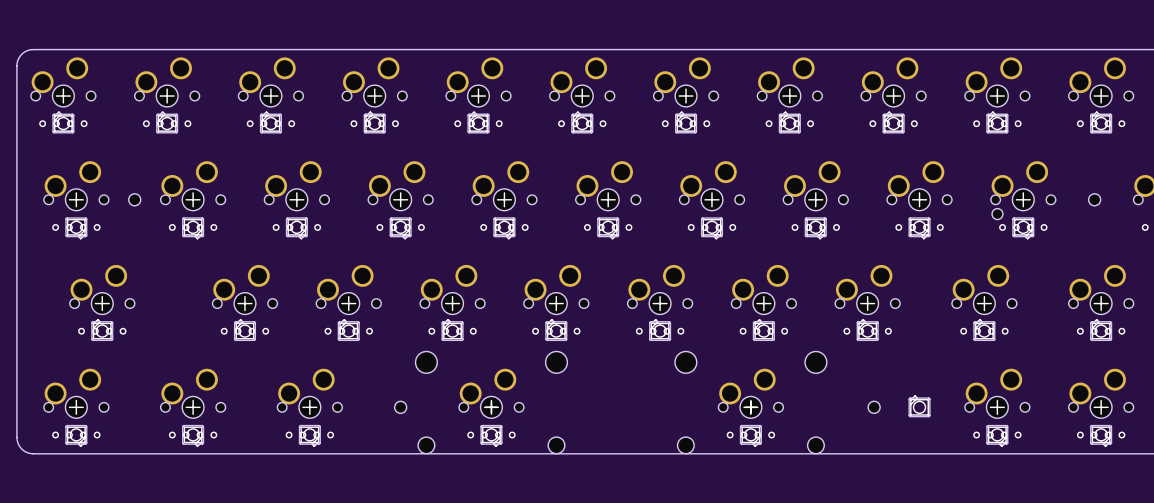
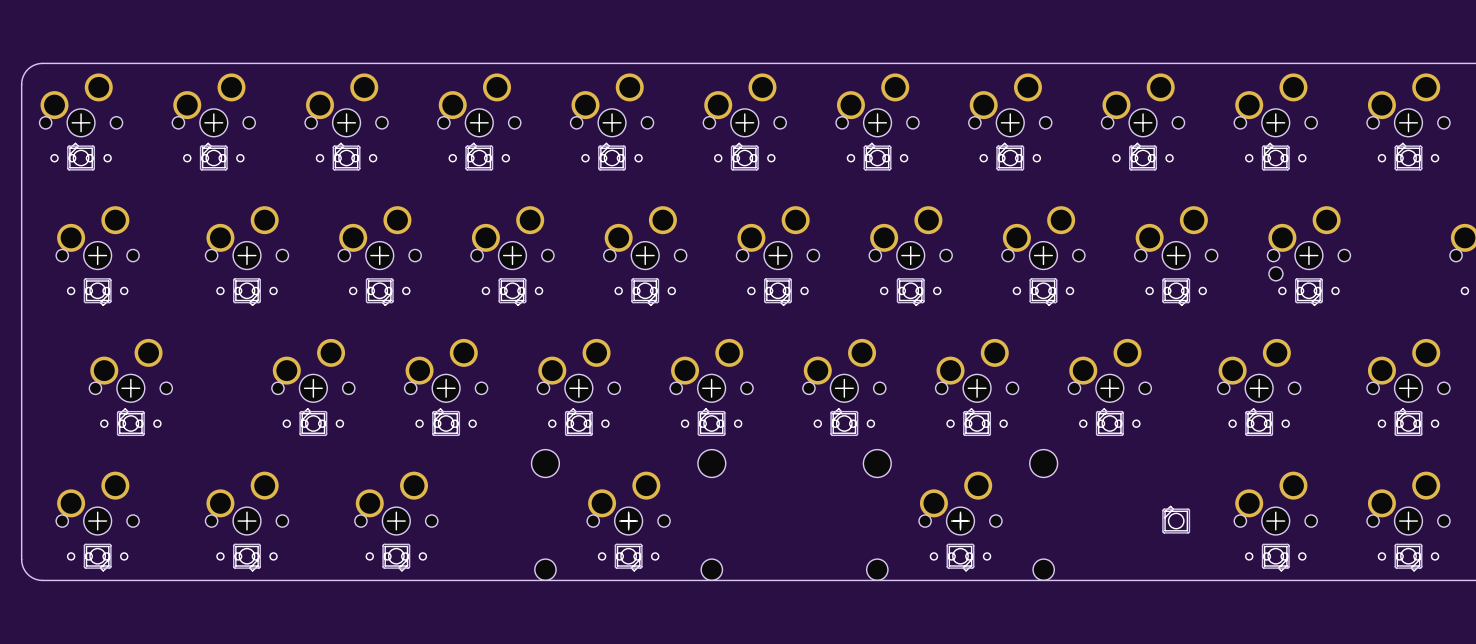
hole: (134, 199) -> none
hole: (1094, 199) -> none
hole: (400, 407) -> none
hole: (874, 407) -> none

